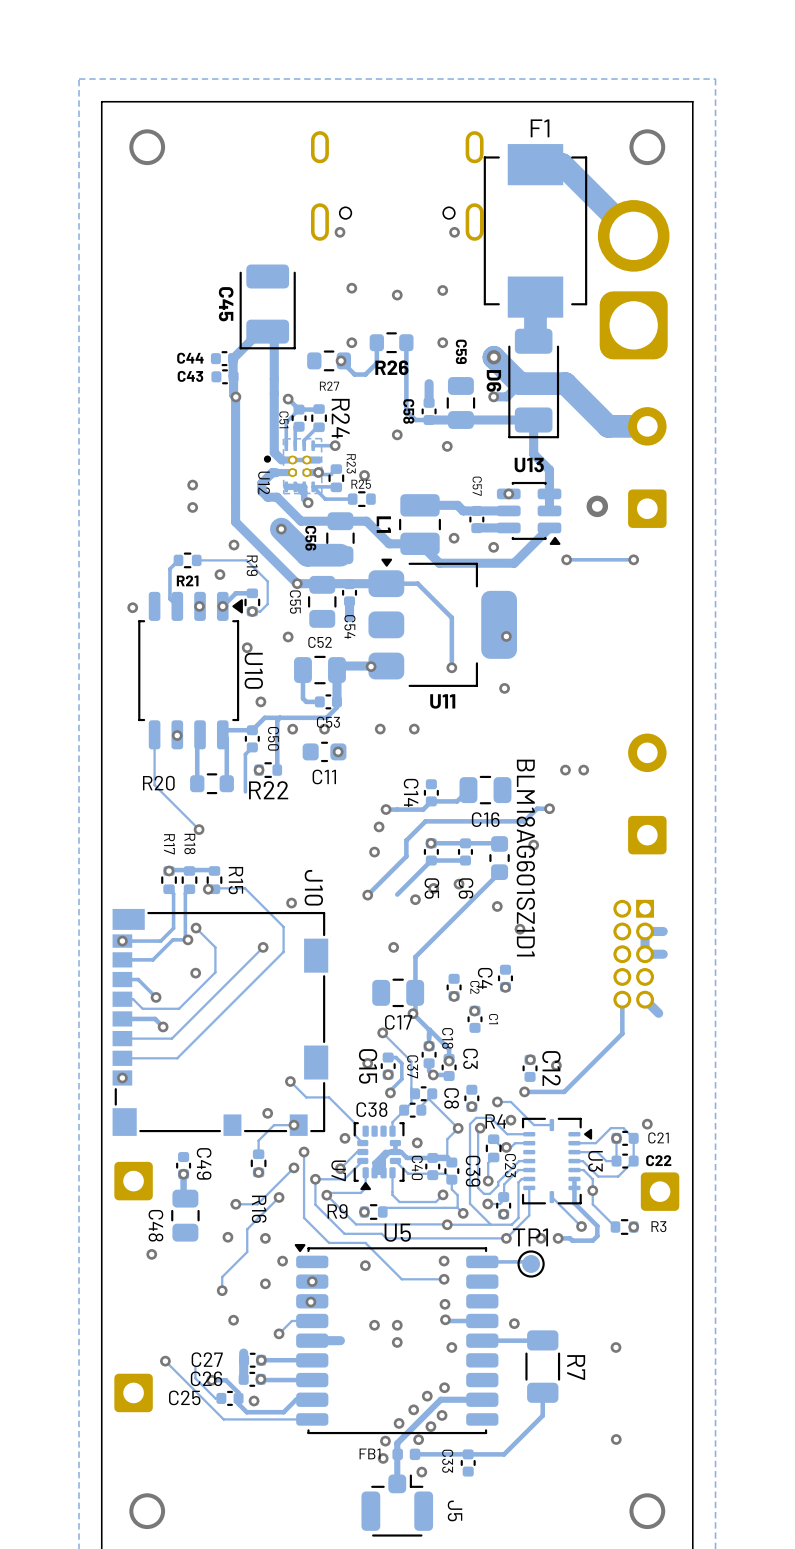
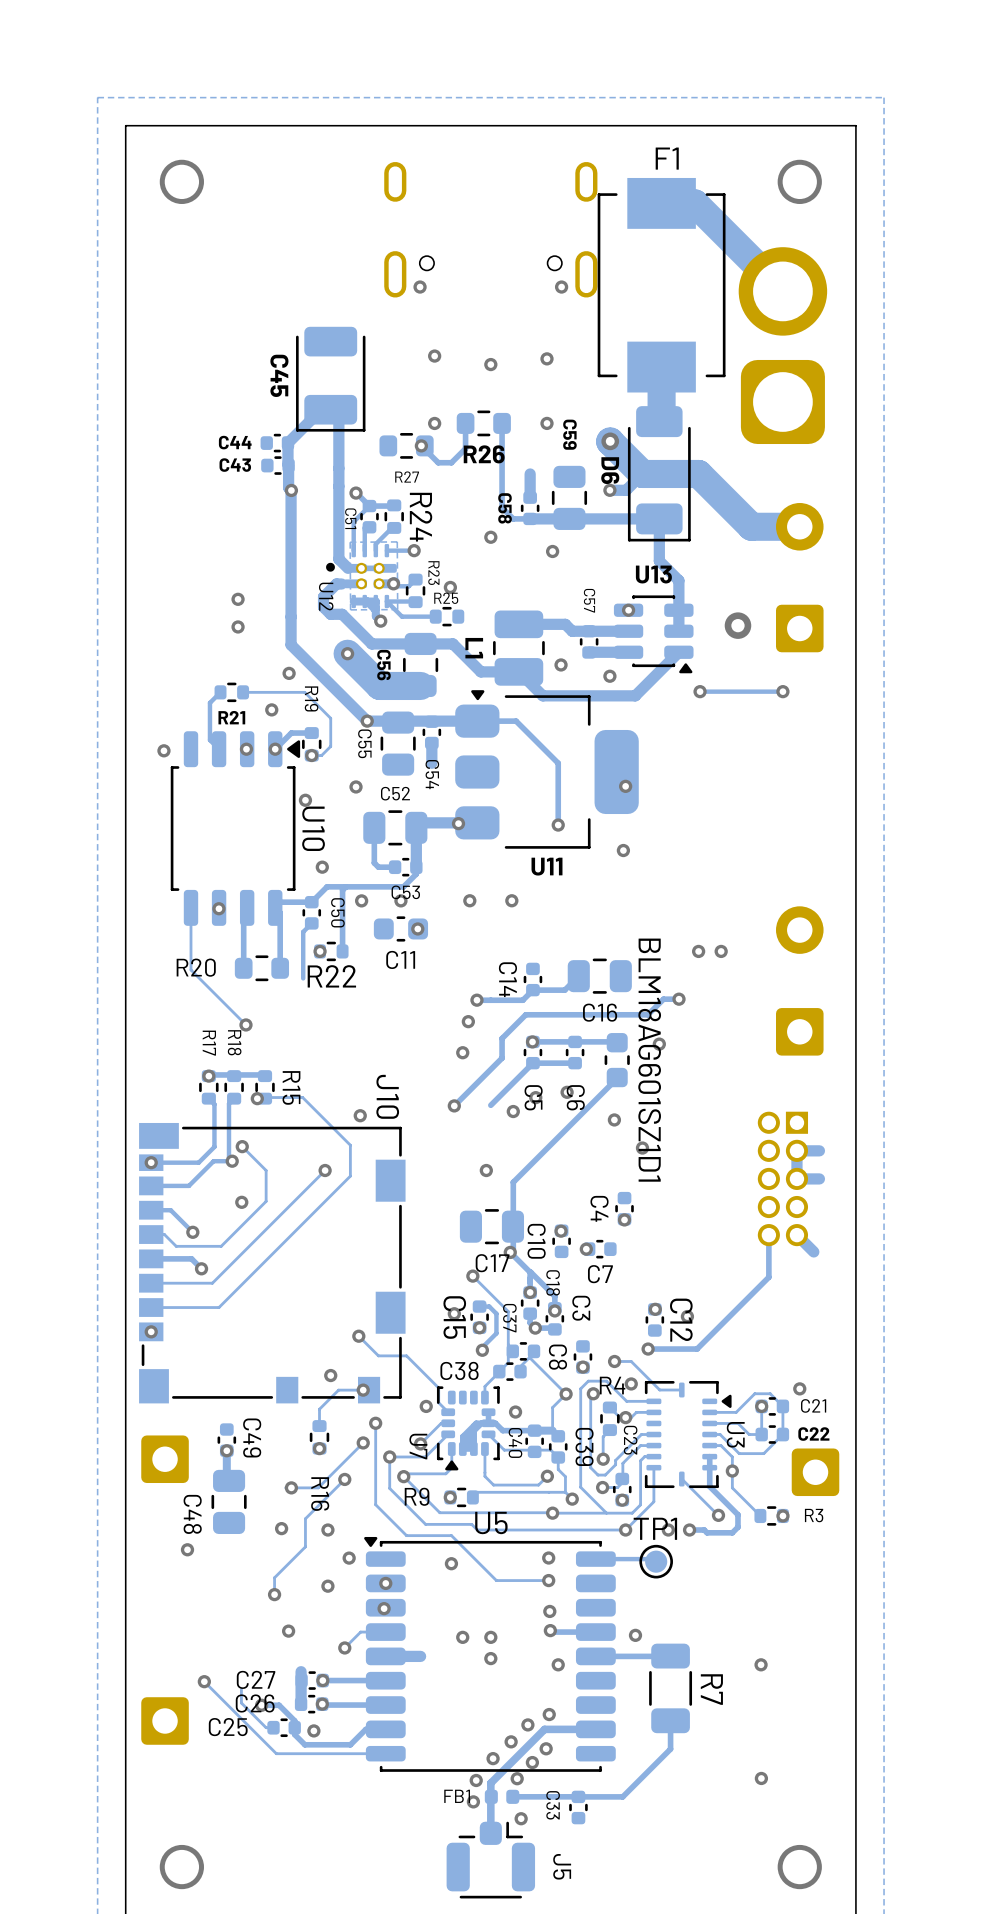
C2: (454, 987) -> none
C10: none -> (561, 1241)
C7: none -> (599, 1249)
C1: (475, 1019) -> none

